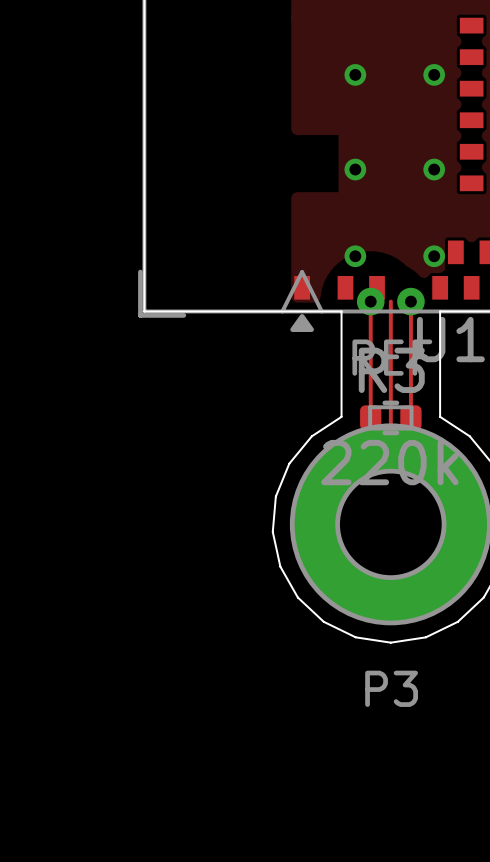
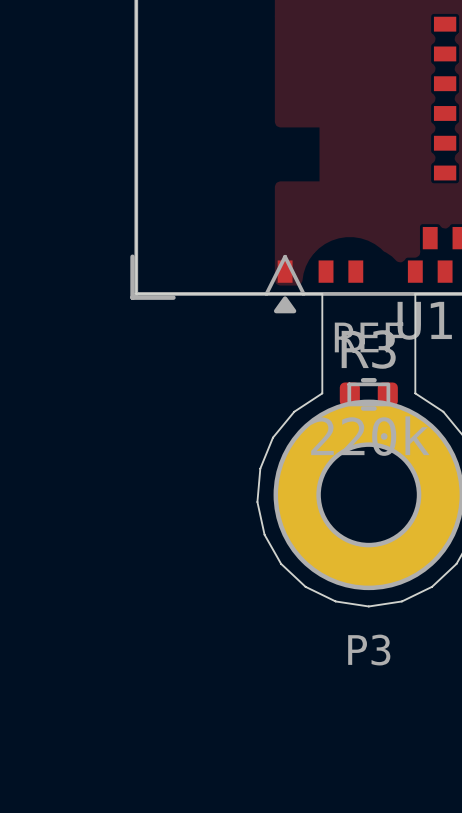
via: (355, 74) -> none
via: (434, 74) -> none
via: (355, 169) -> none
via: (434, 169) -> none
via: (355, 256) -> none
via: (434, 256) -> none
track: (370, 301) (370, 417) -> none
via: (370, 301) -> none
track: (390, 301) (390, 524) -> none
track: (410, 301) (410, 417) -> none
via: (410, 301) -> none

